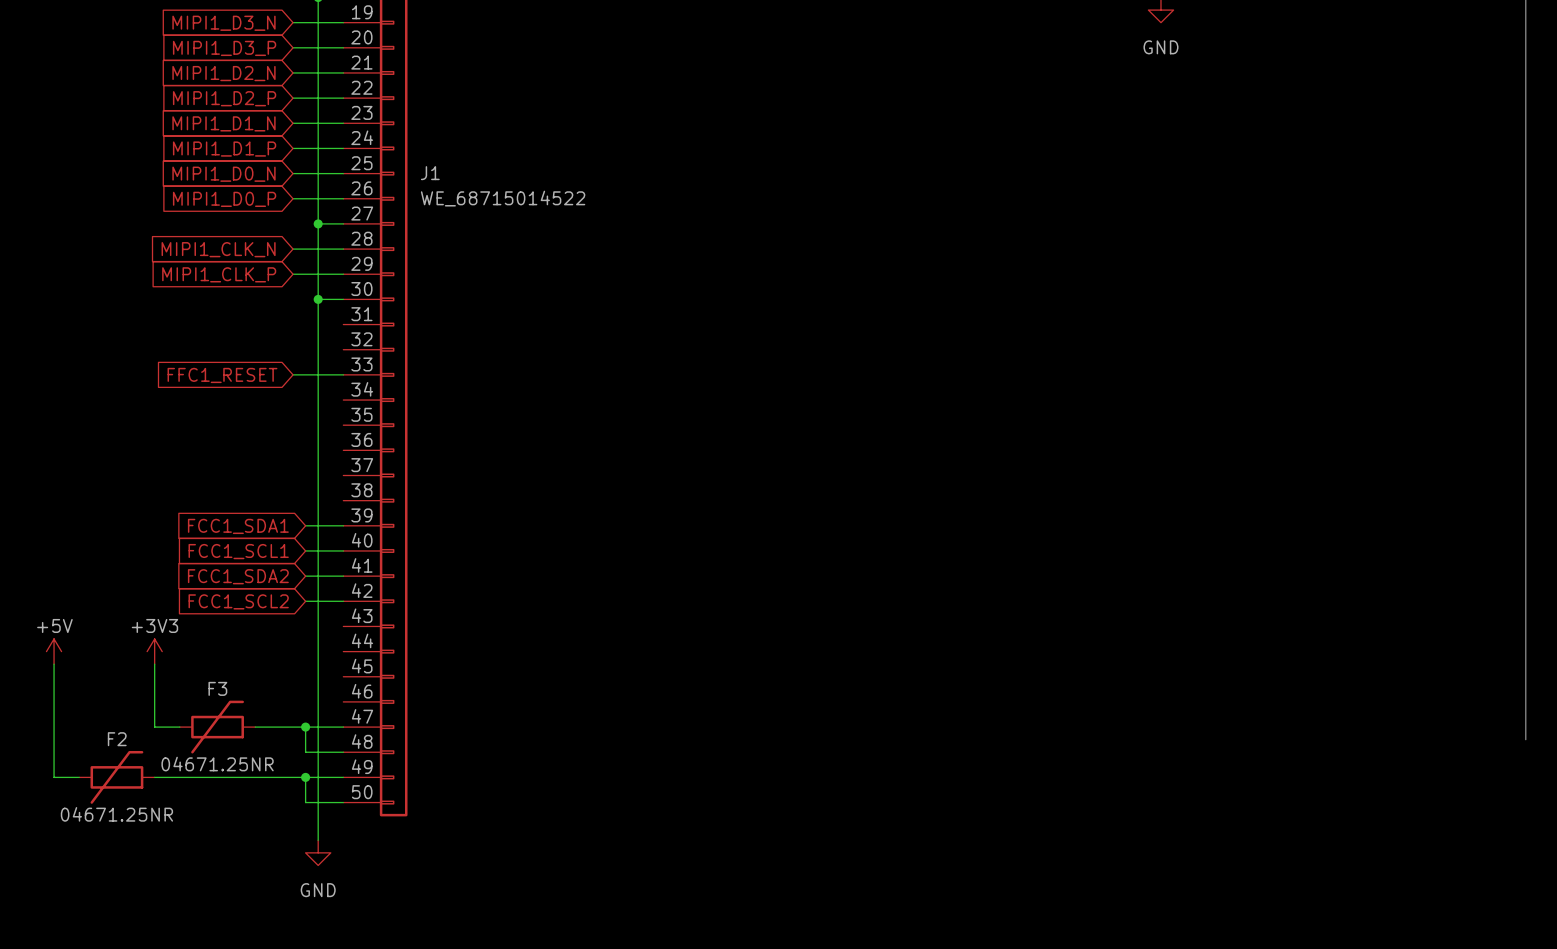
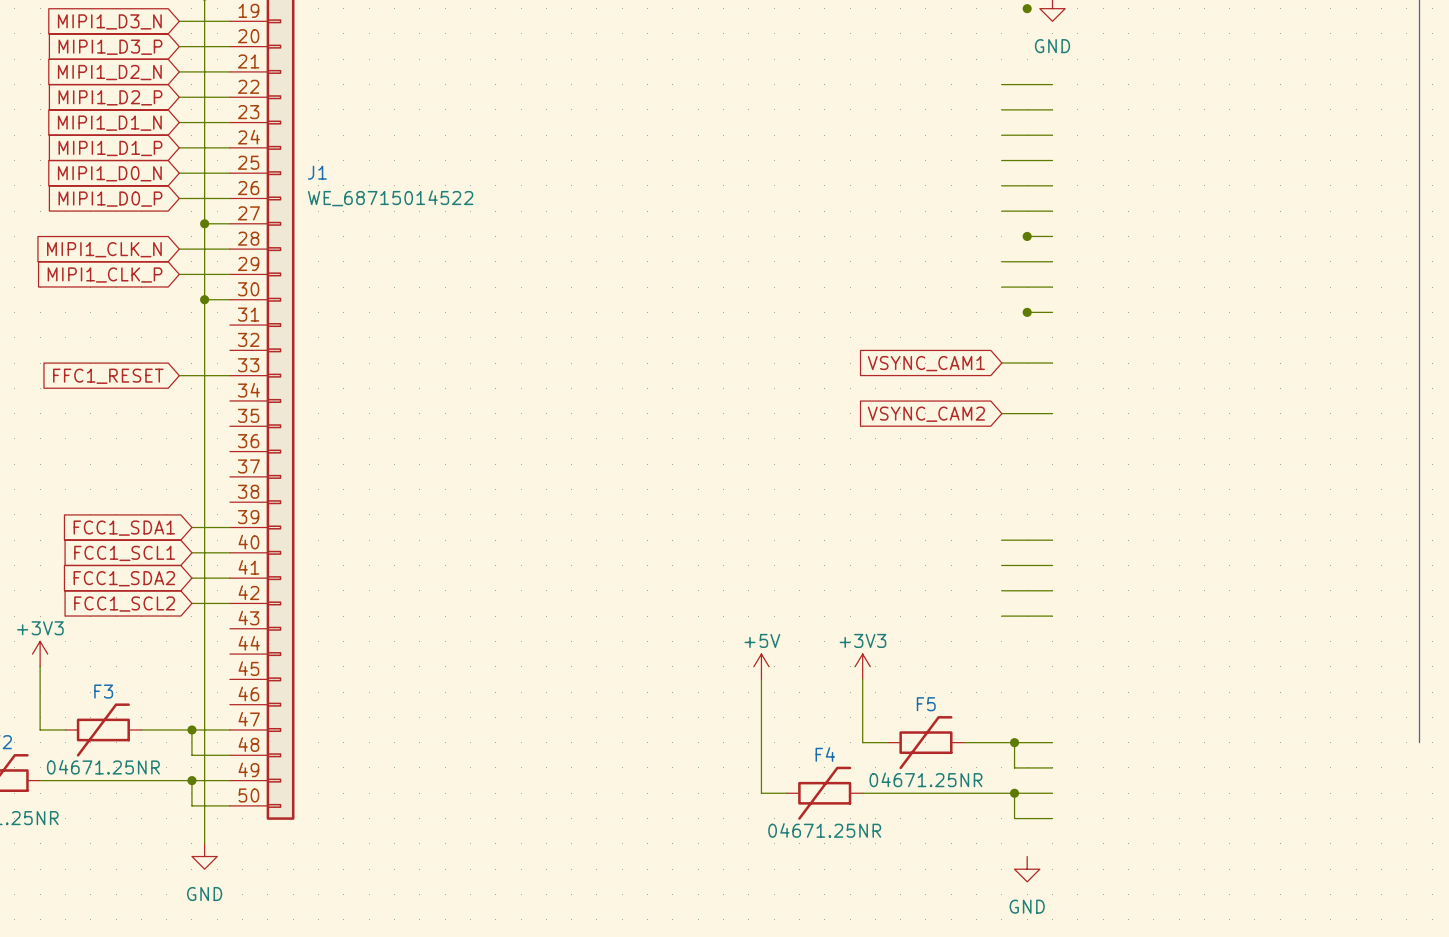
junction: none -> (1027, 8)
wire: none -> (1001, 84) (1052, 84)
wire: none -> (1001, 109) (1052, 109)
wire: none -> (1001, 135) (1052, 135)
wire: none -> (1001, 160) (1052, 160)
wire: none -> (1001, 185) (1052, 185)
wire: none -> (1001, 211) (1052, 211)
wire: none -> (1027, 236) (1052, 236)
junction: none -> (1027, 236)
wire: none -> (1001, 261) (1052, 261)
wire: none -> (1001, 287) (1052, 287)
wire: none -> (1027, 312) (1052, 312)
junction: none -> (1027, 312)
global label: none -> VSYNC_CAM1 (926, 363)
wire: none -> (1001, 363) (1052, 363)
wire: none -> (1001, 413) (1052, 413)
global label: none -> VSYNC_CAM2 (926, 414)
wire: none -> (1001, 540) (1052, 540)
wire: none -> (1001, 565) (1052, 565)
wire: none -> (1001, 590) (1052, 590)
wire: none -> (1001, 616) (1052, 616)
power symbol: none -> +5V (761, 666)
power symbol: none -> +3V3 (862, 666)
wire: none -> (761, 679) (761, 793) (786, 793)
wire: none -> (862, 679) (862, 742) (887, 742)
F5: none -> 04671.25NR (925, 742)
wire: none -> (963, 742) (1052, 742)
wire: none -> (1014, 742) (1014, 767) (1052, 767)
junction: none -> (1014, 742)
F4: none -> 04671.25NR (824, 793)
wire: none -> (862, 793) (1052, 793)
wire: none -> (1014, 793) (1014, 818) (1052, 818)
junction: none -> (1014, 793)
power symbol: none -> GND (1027, 869)

